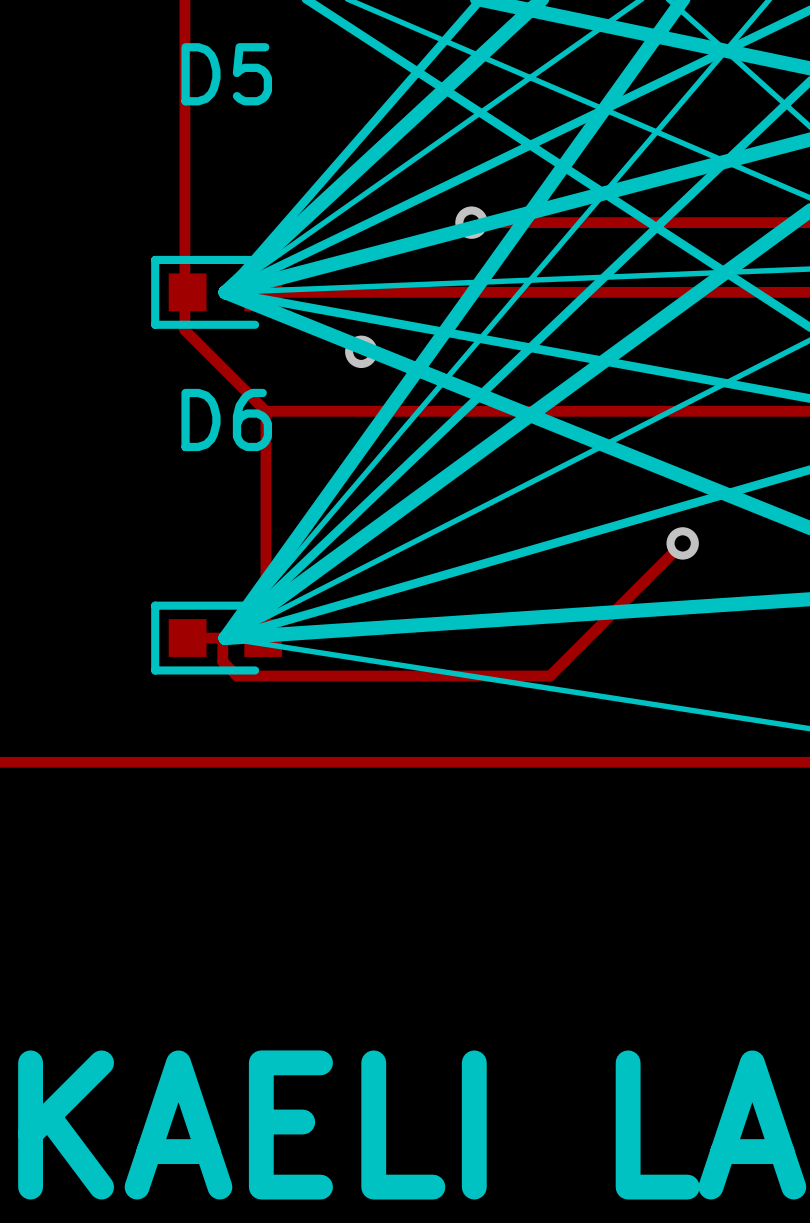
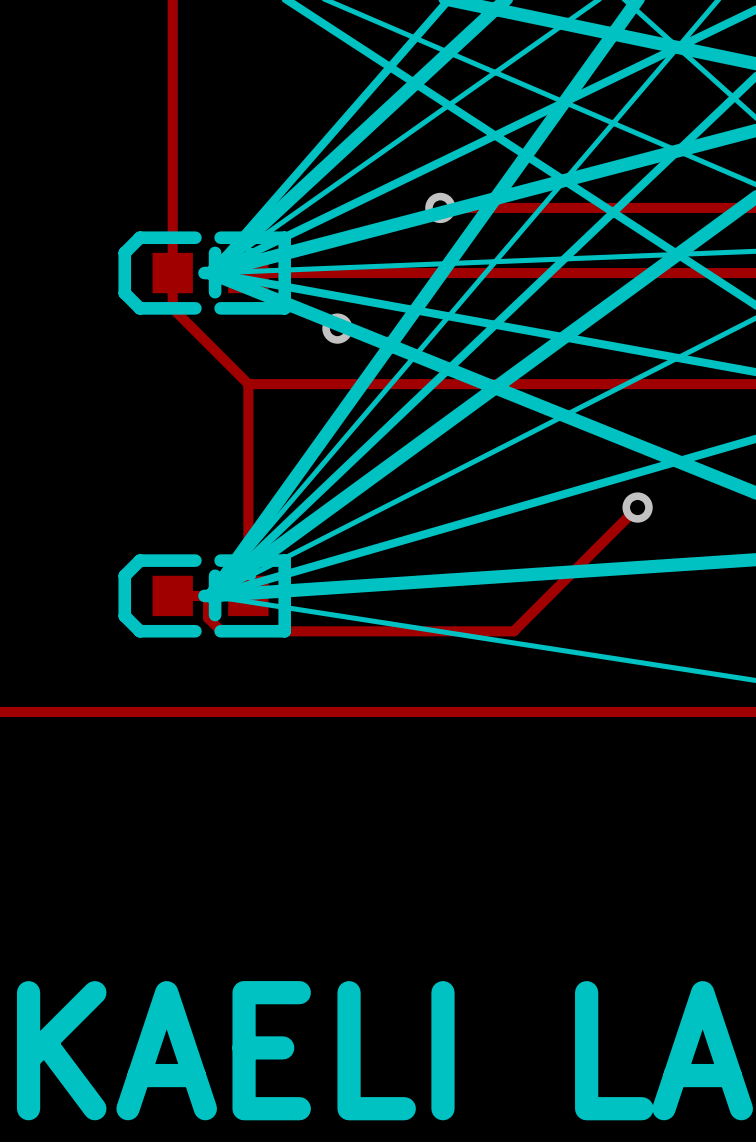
D5: (216, 292) -> none
part: none -> (204, 273)
D6: (216, 638) -> none
part: none -> (204, 595)

